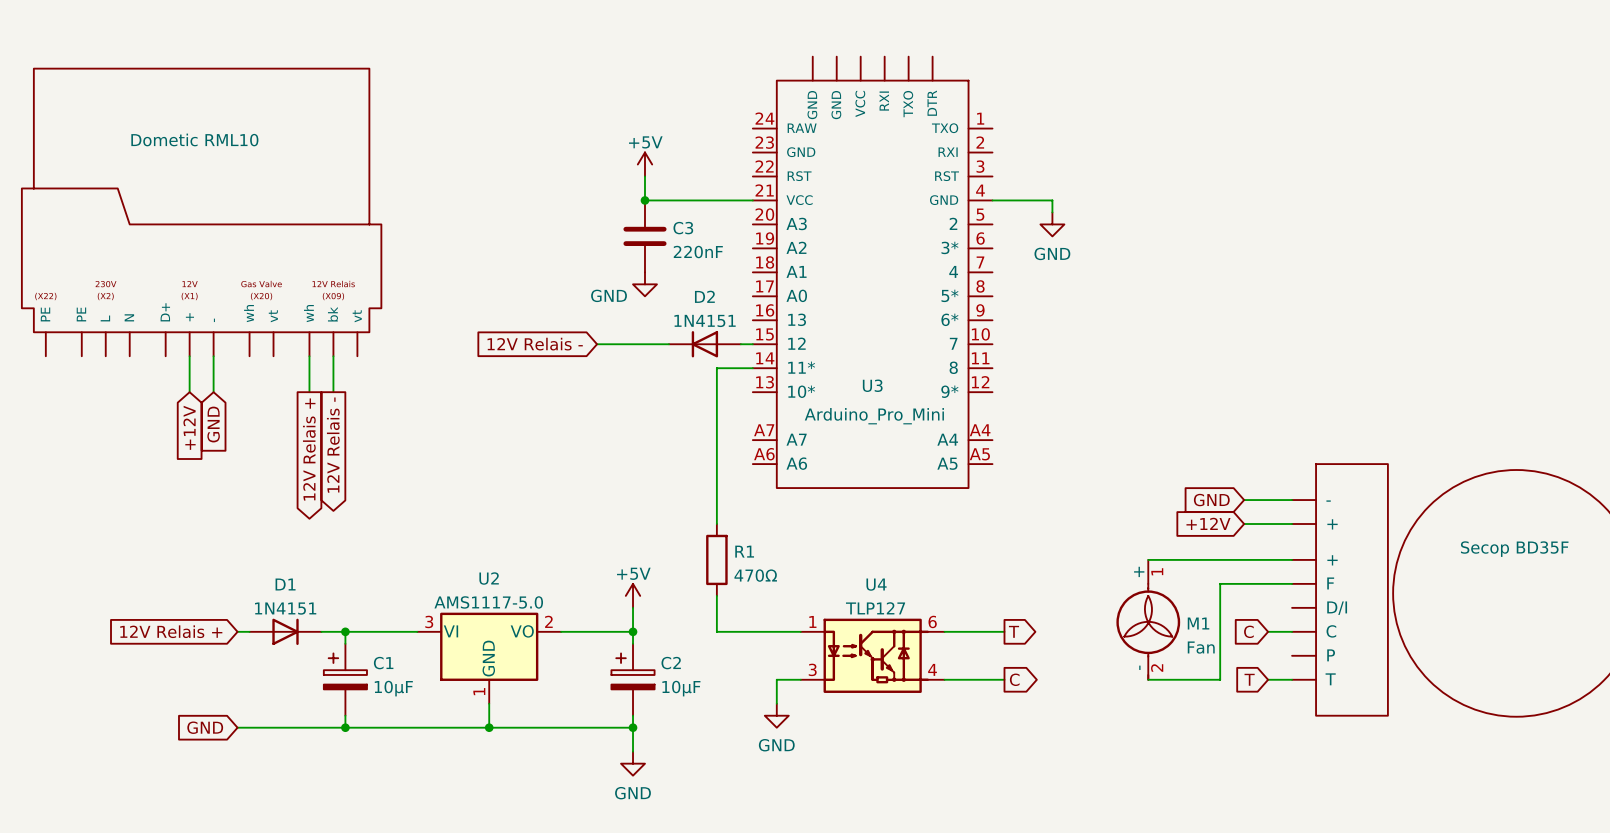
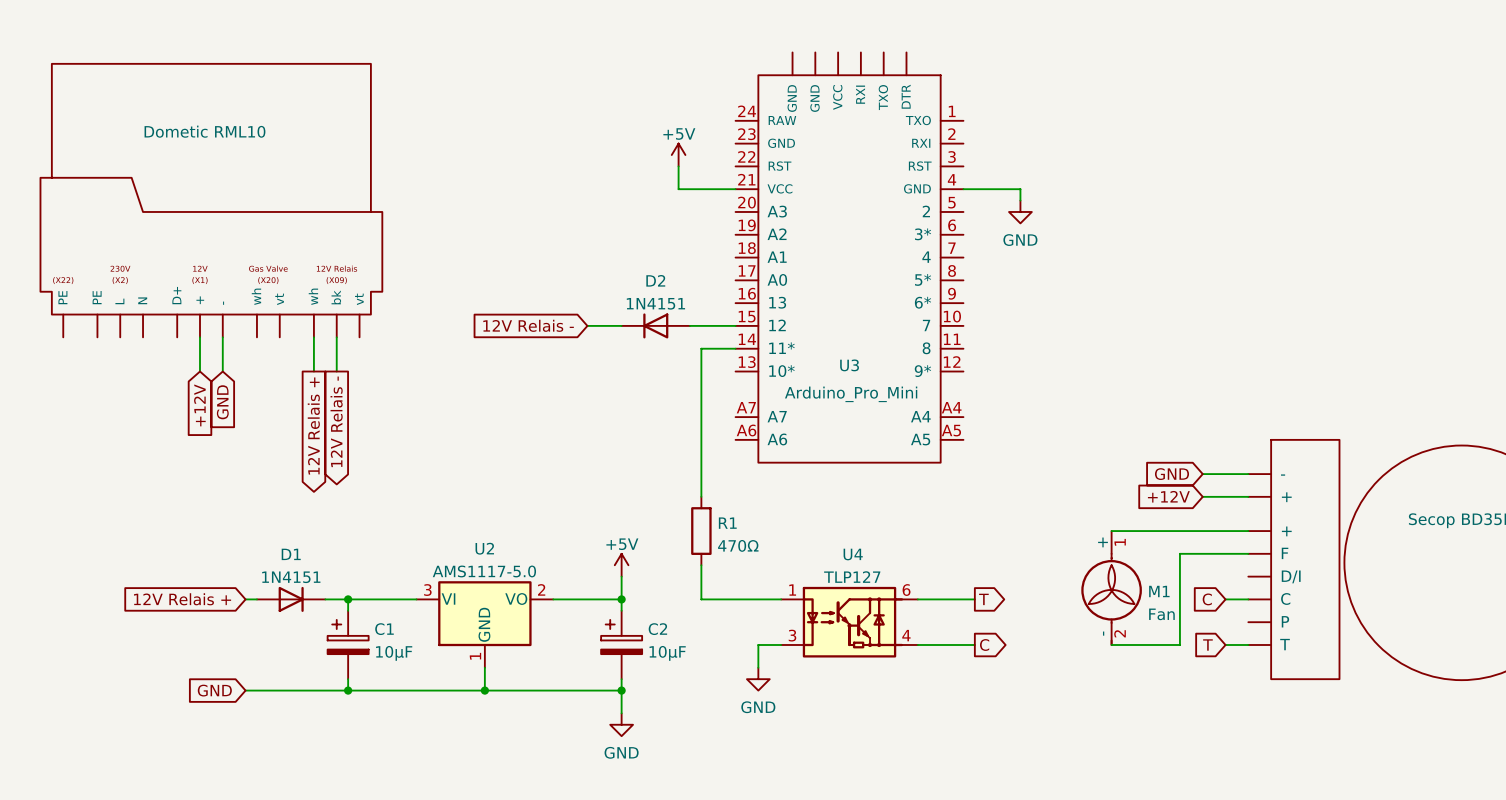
power symbol position: +5V (644, 164) -> +5V (678, 155)
wire: (644, 176) (644, 200) (692, 200) -> (678, 166) (678, 189)
junction: (644, 200) -> none
C3: 220nF (644, 236) -> none
power symbol: GND (644, 284) -> none
D2 position: (704, 344) -> (655, 325)

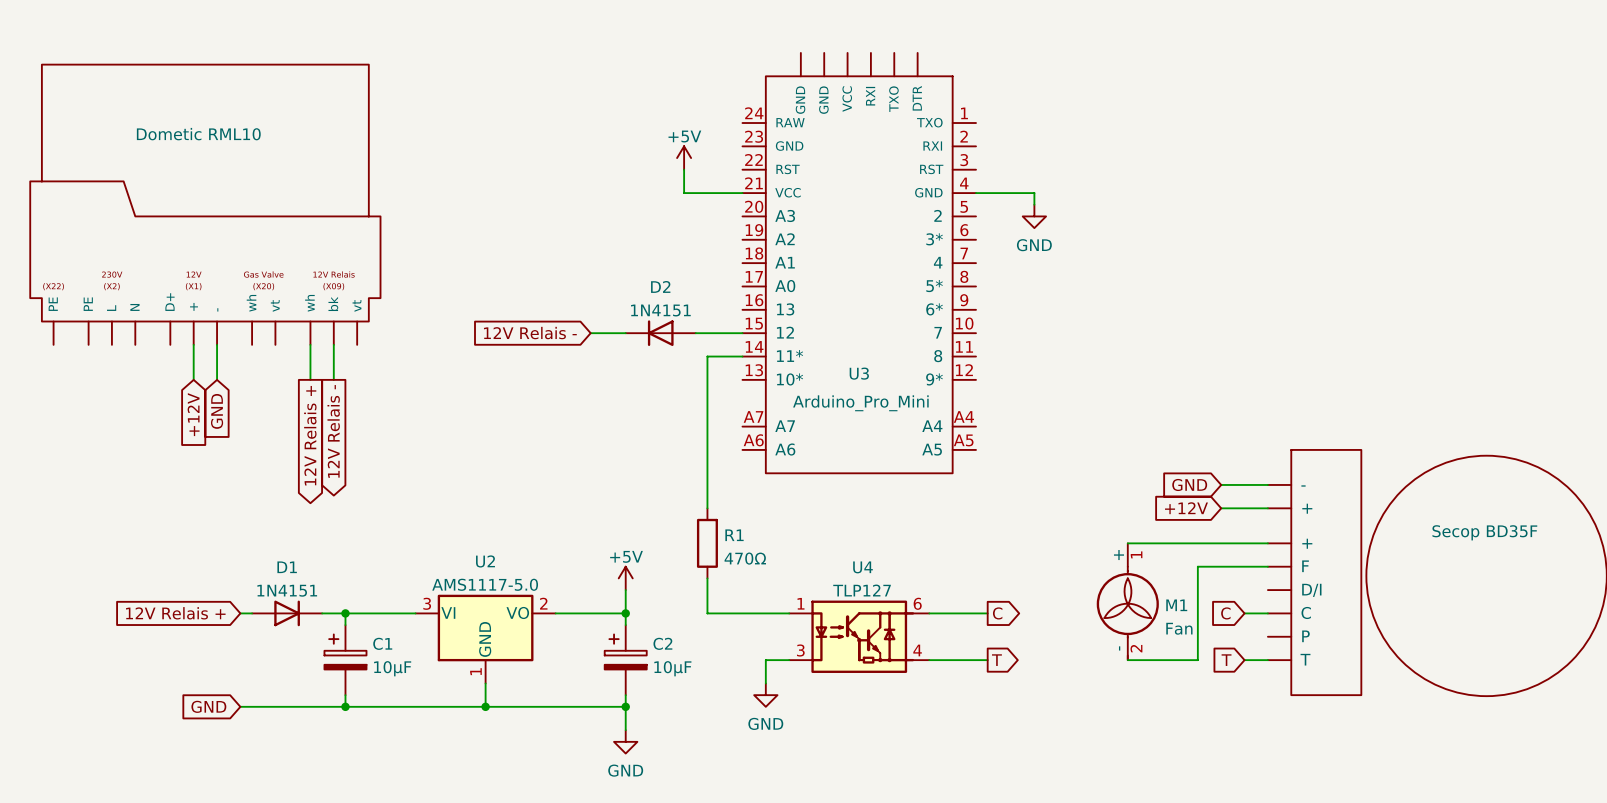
global label: T (983, 599) -> C (997, 613)
global label: C (984, 645) -> T (996, 660)

